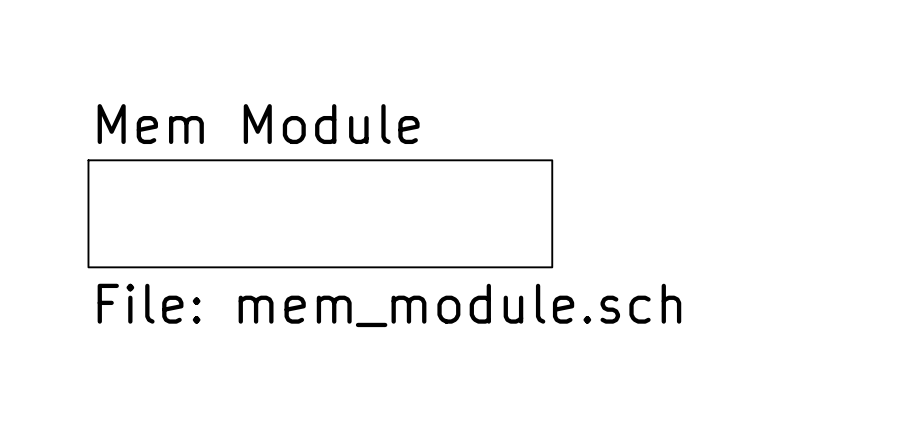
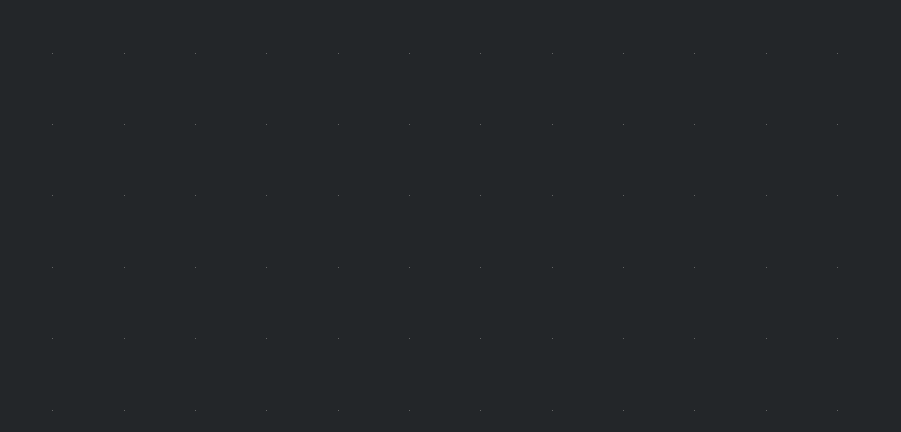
sheet Mem Module: File: mem_module.sch (320, 213) -> none

